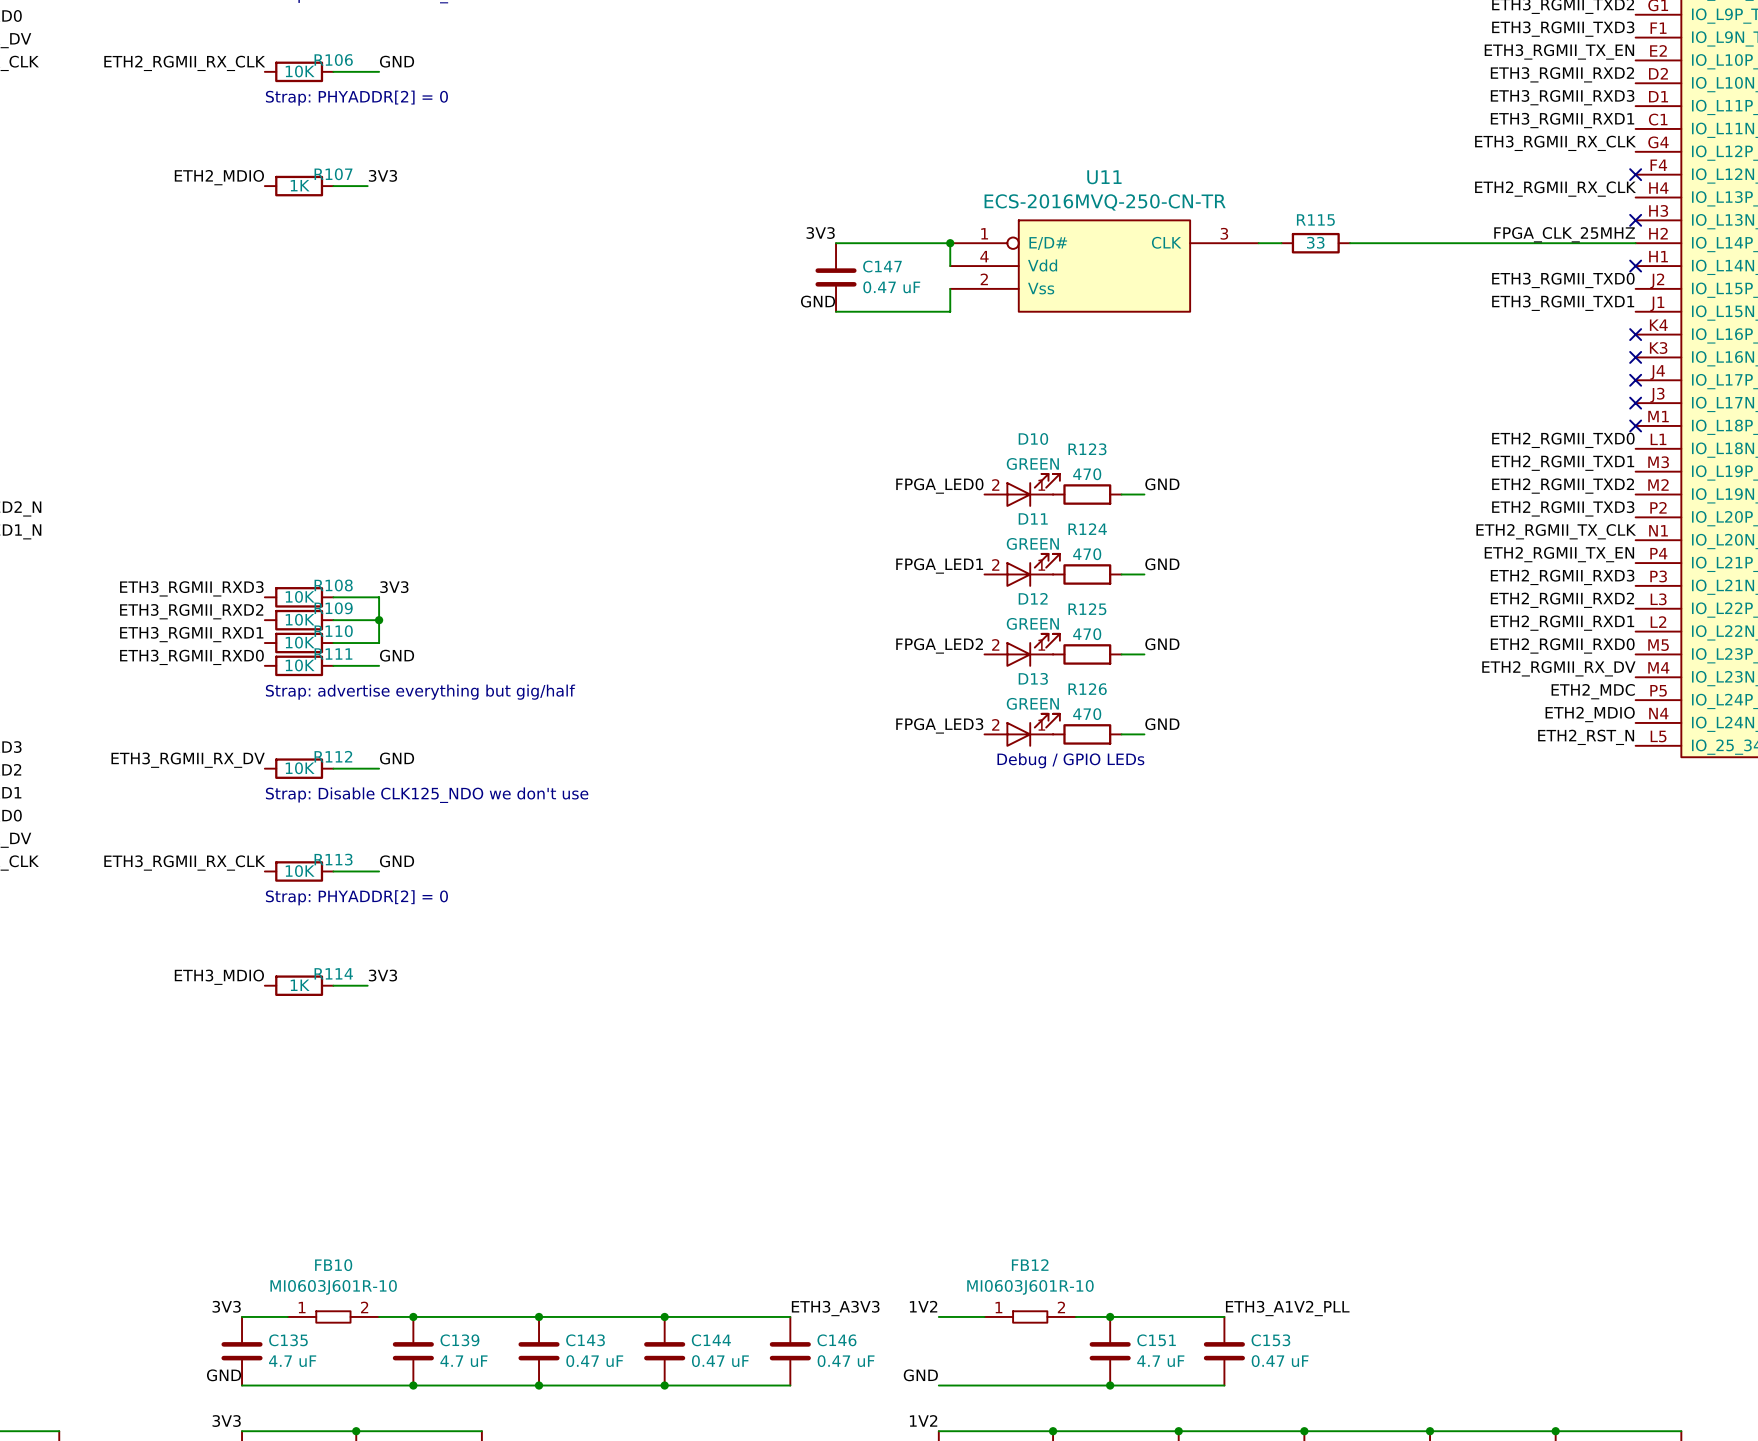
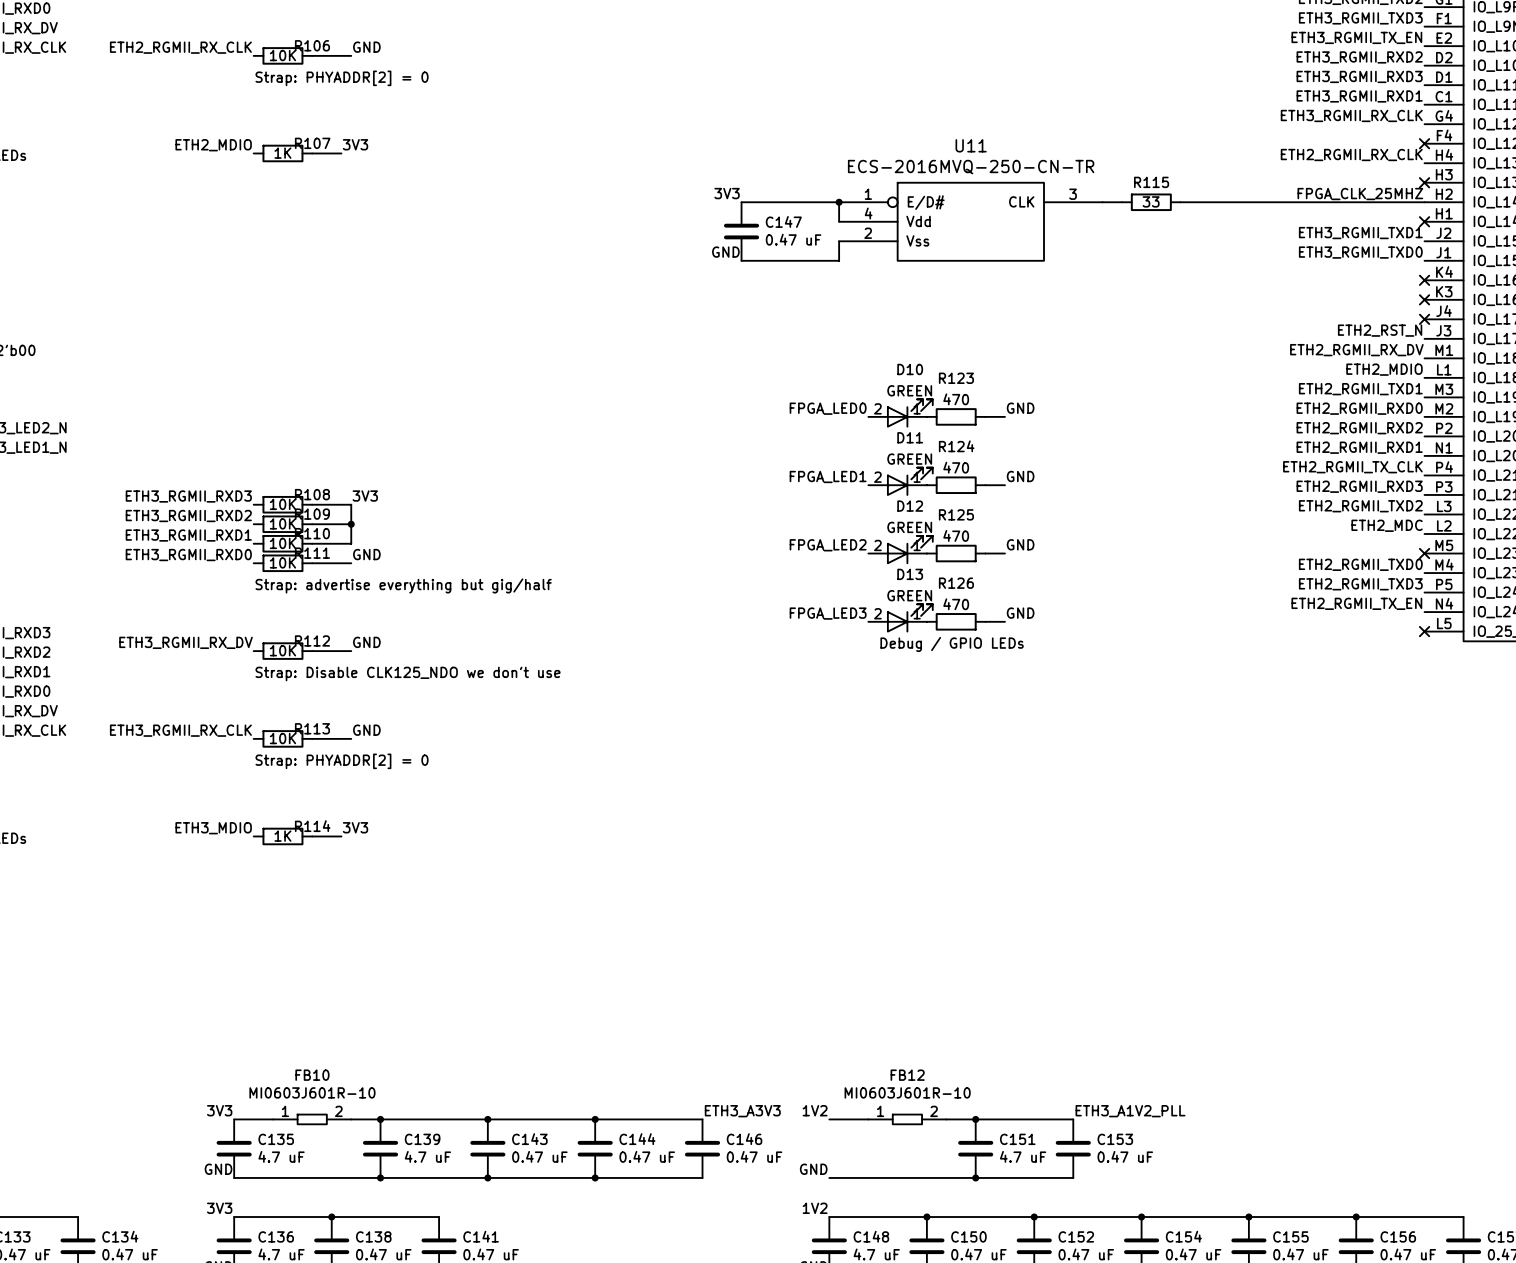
label: ETH3_RGMII_TXD0 (1563, 280) -> ETH3_RGMII_TXD1 (1360, 233)
label: ETH3_RGMII_TXD1 (1563, 303) -> ETH3_RGMII_TXD0 (1360, 252)
label: none -> ETH2_RST_N (1380, 330)
no-connect mark: (1635, 403) -> none
label: none -> ETH2_RGMII_RX_DV (1356, 350)
no-connect mark: (1635, 425) -> none
label: ETH2_RGMII_TXD0 (1563, 440) -> ETH2_MDIO (1384, 369)
label: ETH2_RGMII_TXD2 (1563, 486) -> ETH2_RGMII_RXD0 (1359, 408)
label: ETH2_RGMII_TXD3 (1563, 508) -> ETH2_RGMII_RXD2 (1359, 428)
label: ETH2_RGMII_TX_CLK (1556, 531) -> ETH2_RGMII_RXD1 (1359, 447)
label: ETH2_RGMII_TX_EN (1559, 554) -> ETH2_RGMII_TX_CLK (1352, 467)
label: ETH2_RGMII_RXD2 (1562, 600) -> ETH2_RGMII_TXD2 (1360, 506)
label: ETH2_RGMII_RXD1 (1562, 623) -> ETH2_MDC (1387, 525)
label: ETH2_RGMII_RXD0 (1562, 645) -> none
no-connect mark: none -> (1424, 553)
label: ETH2_RGMII_RX_DV (1558, 668) -> ETH2_RGMII_TXD0 (1360, 564)
label: ETH2_MDC (1593, 691) -> ETH2_RGMII_TXD3 (1360, 584)
label: ETH2_MDIO (1590, 714) -> ETH2_RGMII_TX_EN (1356, 603)
label: ETH2_RST_N (1586, 737) -> none
no-connect mark: none -> (1424, 631)

